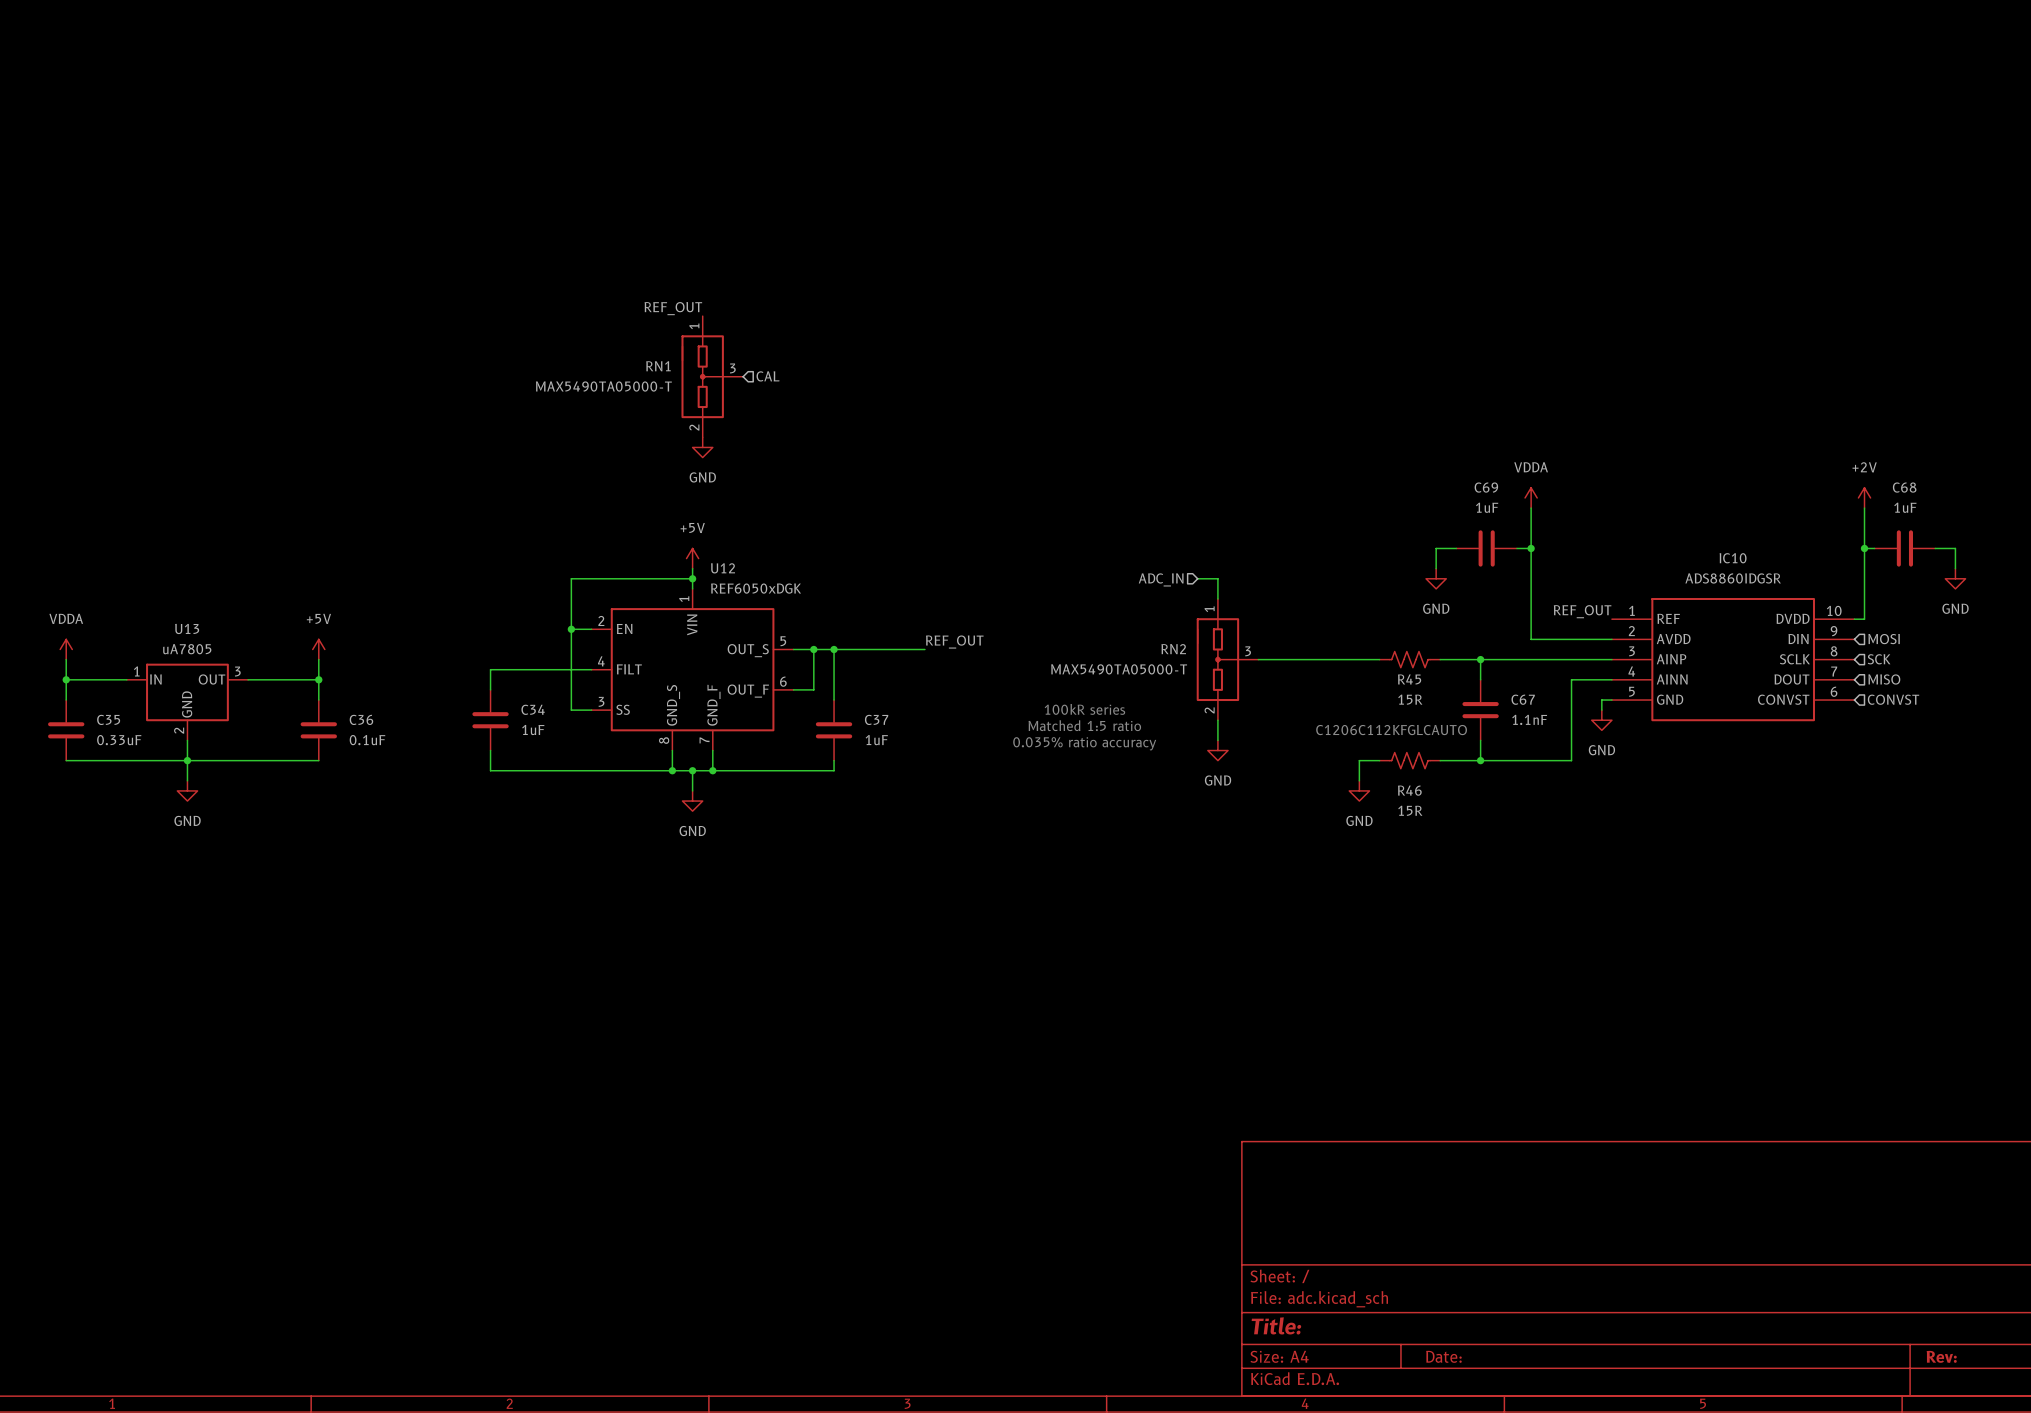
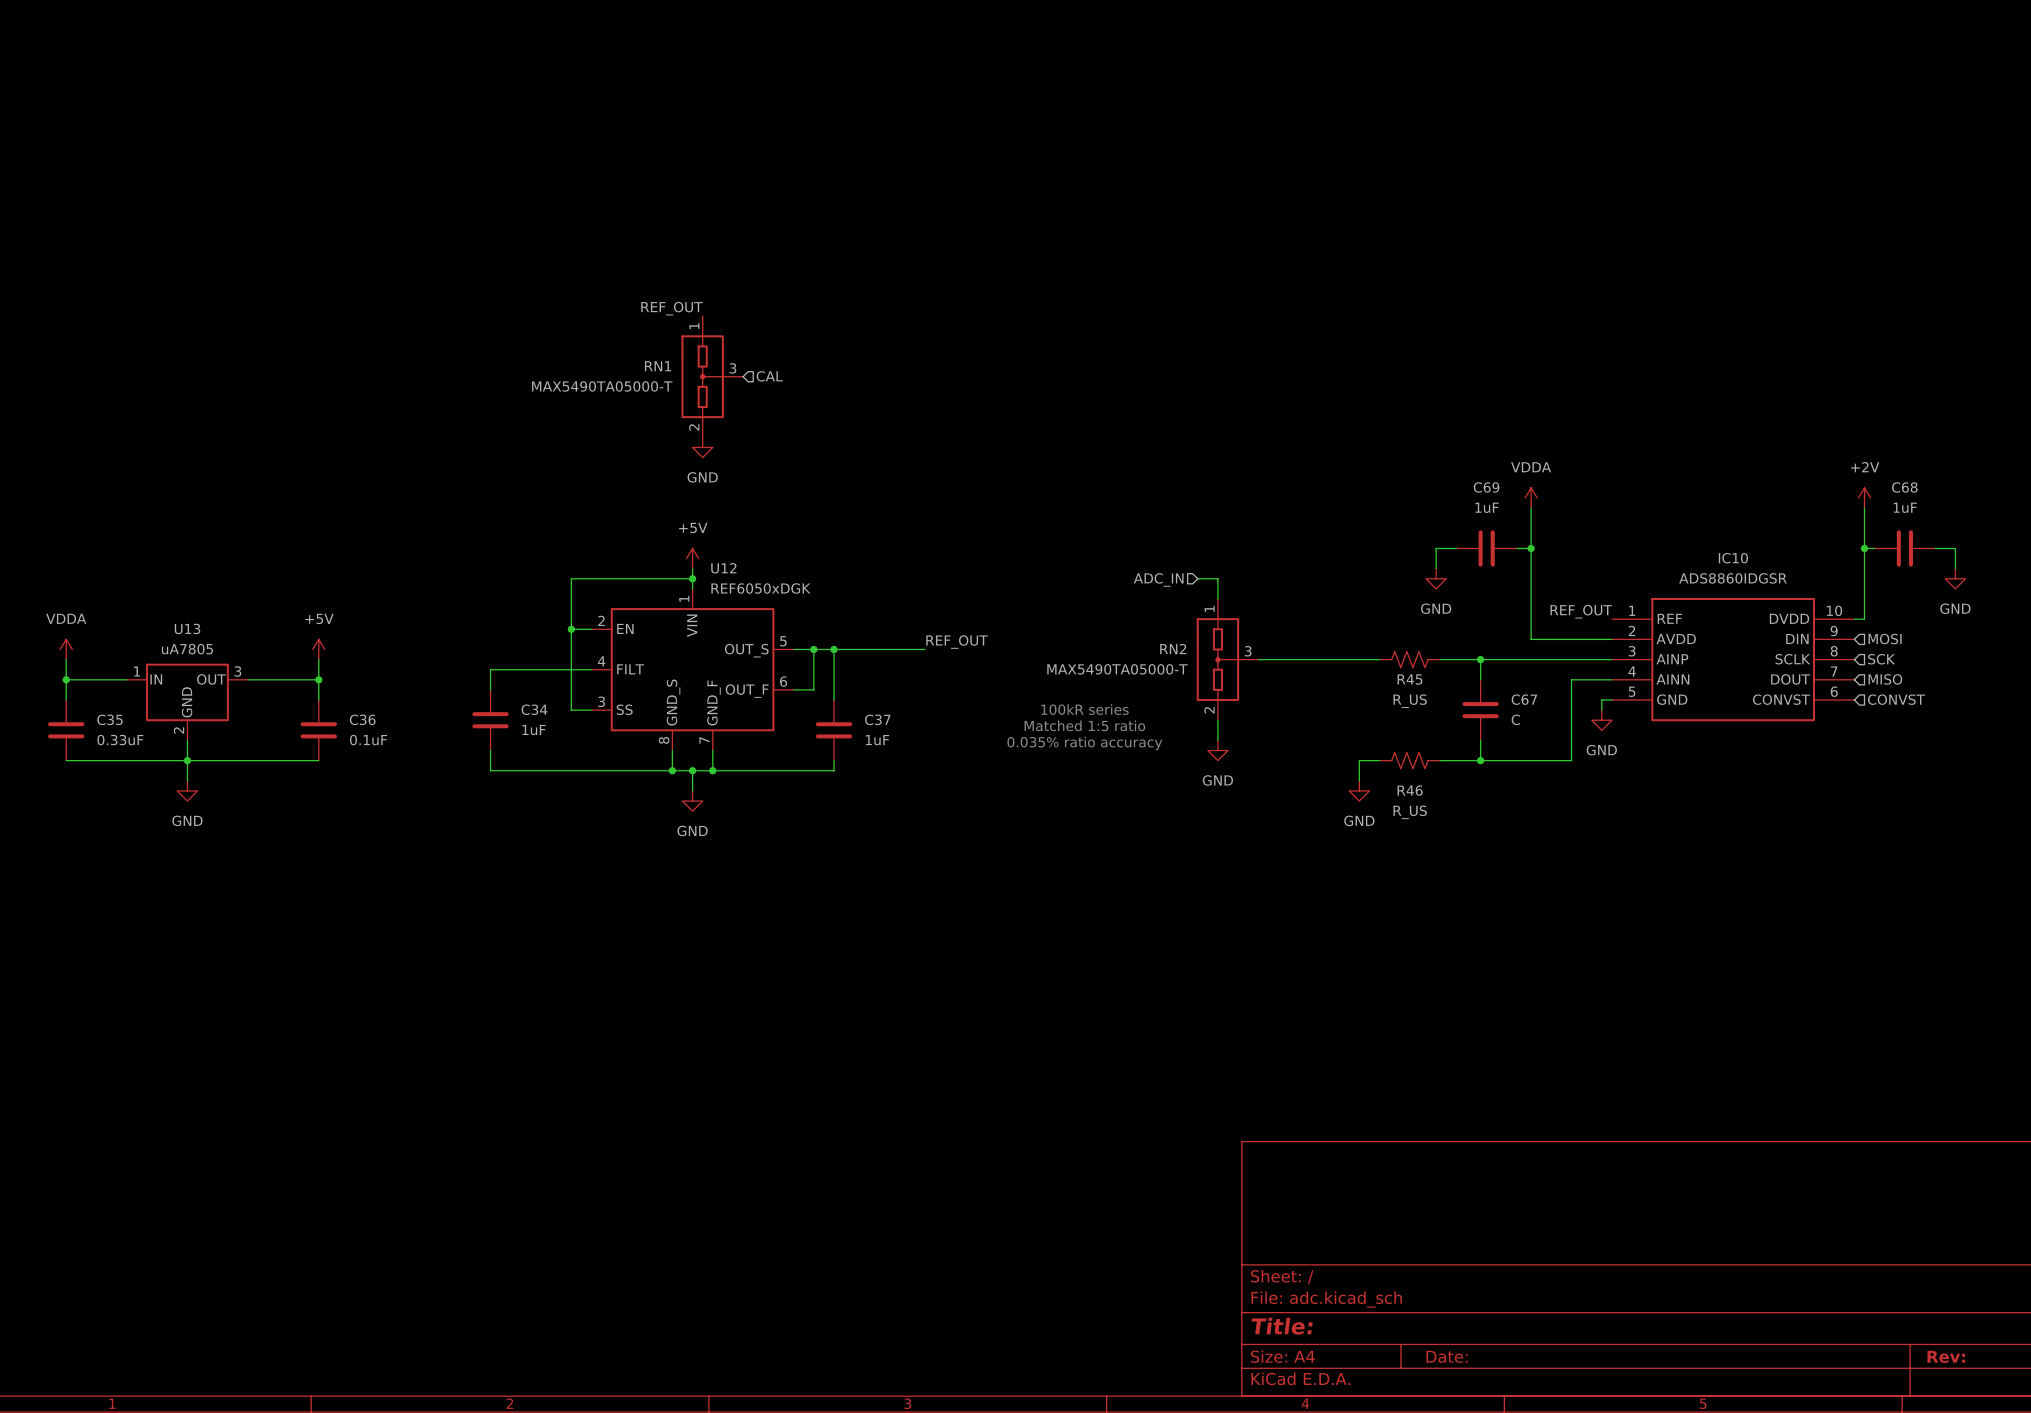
R45 value: 15R (1410, 699) -> R_US (1410, 701)
C67 value: 1.1nF (1529, 719) -> C (1515, 719)
text: C1206C112KFGLCAUTO (1391, 730) -> none
R46 value: 15R (1410, 810) -> R_US (1410, 812)

